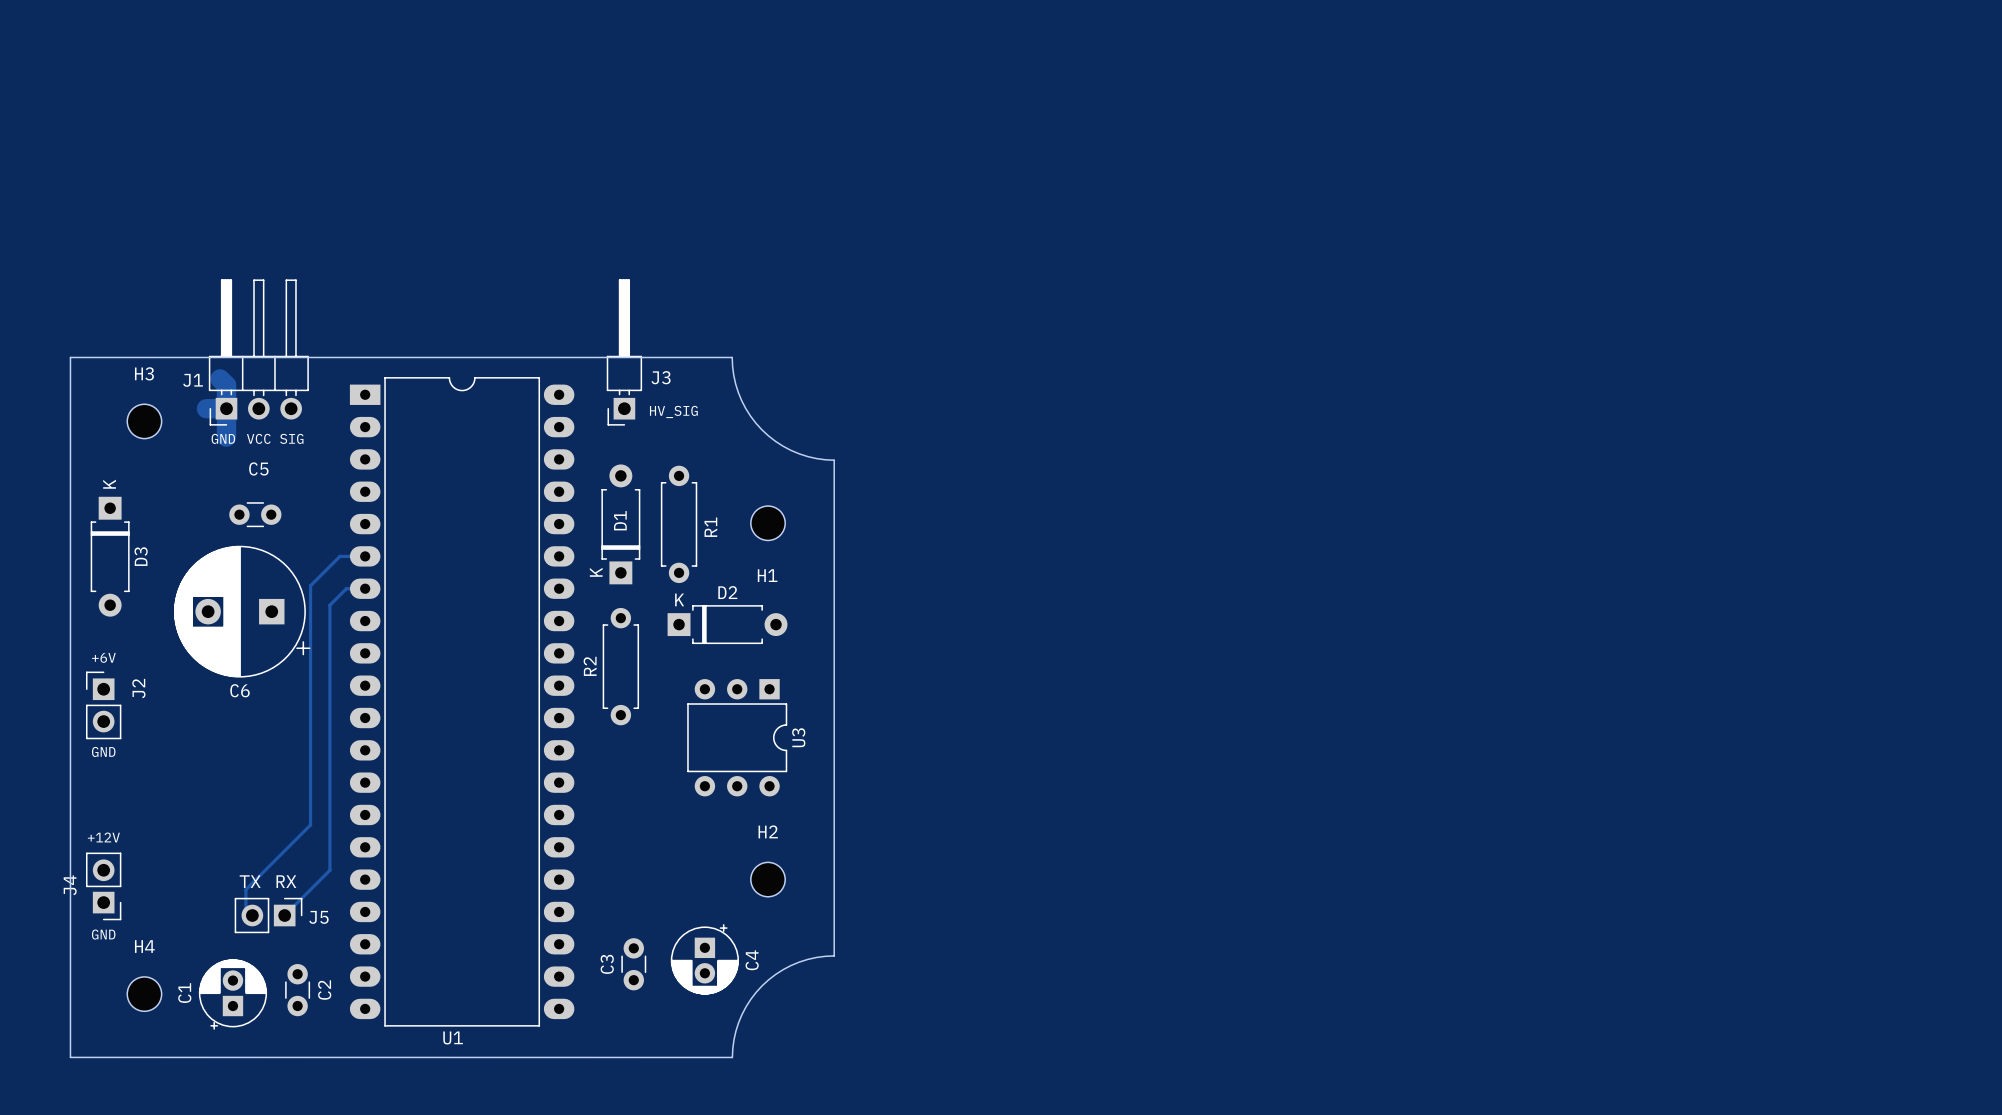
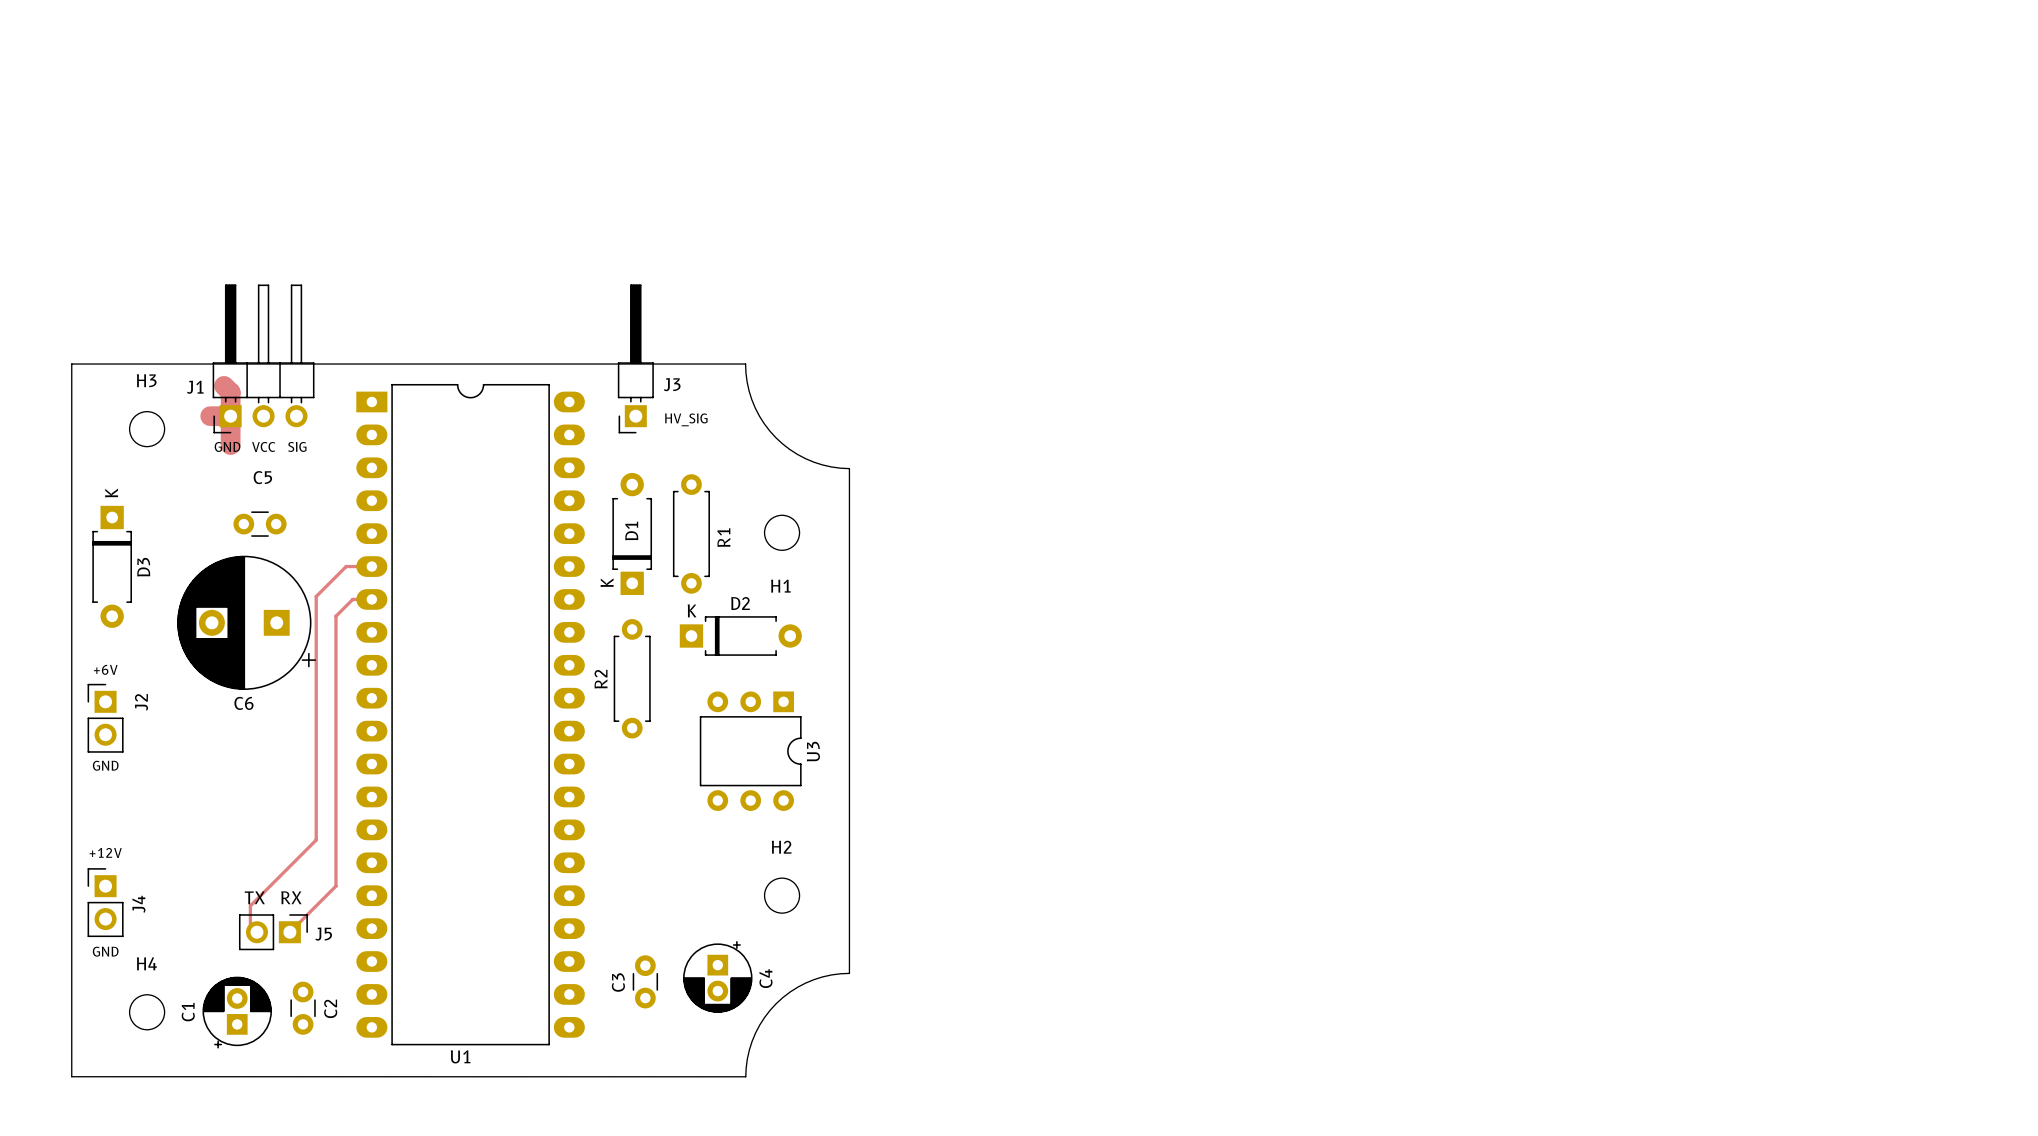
J4 rotation: 0° (103, 886) -> 180° (105, 902)

